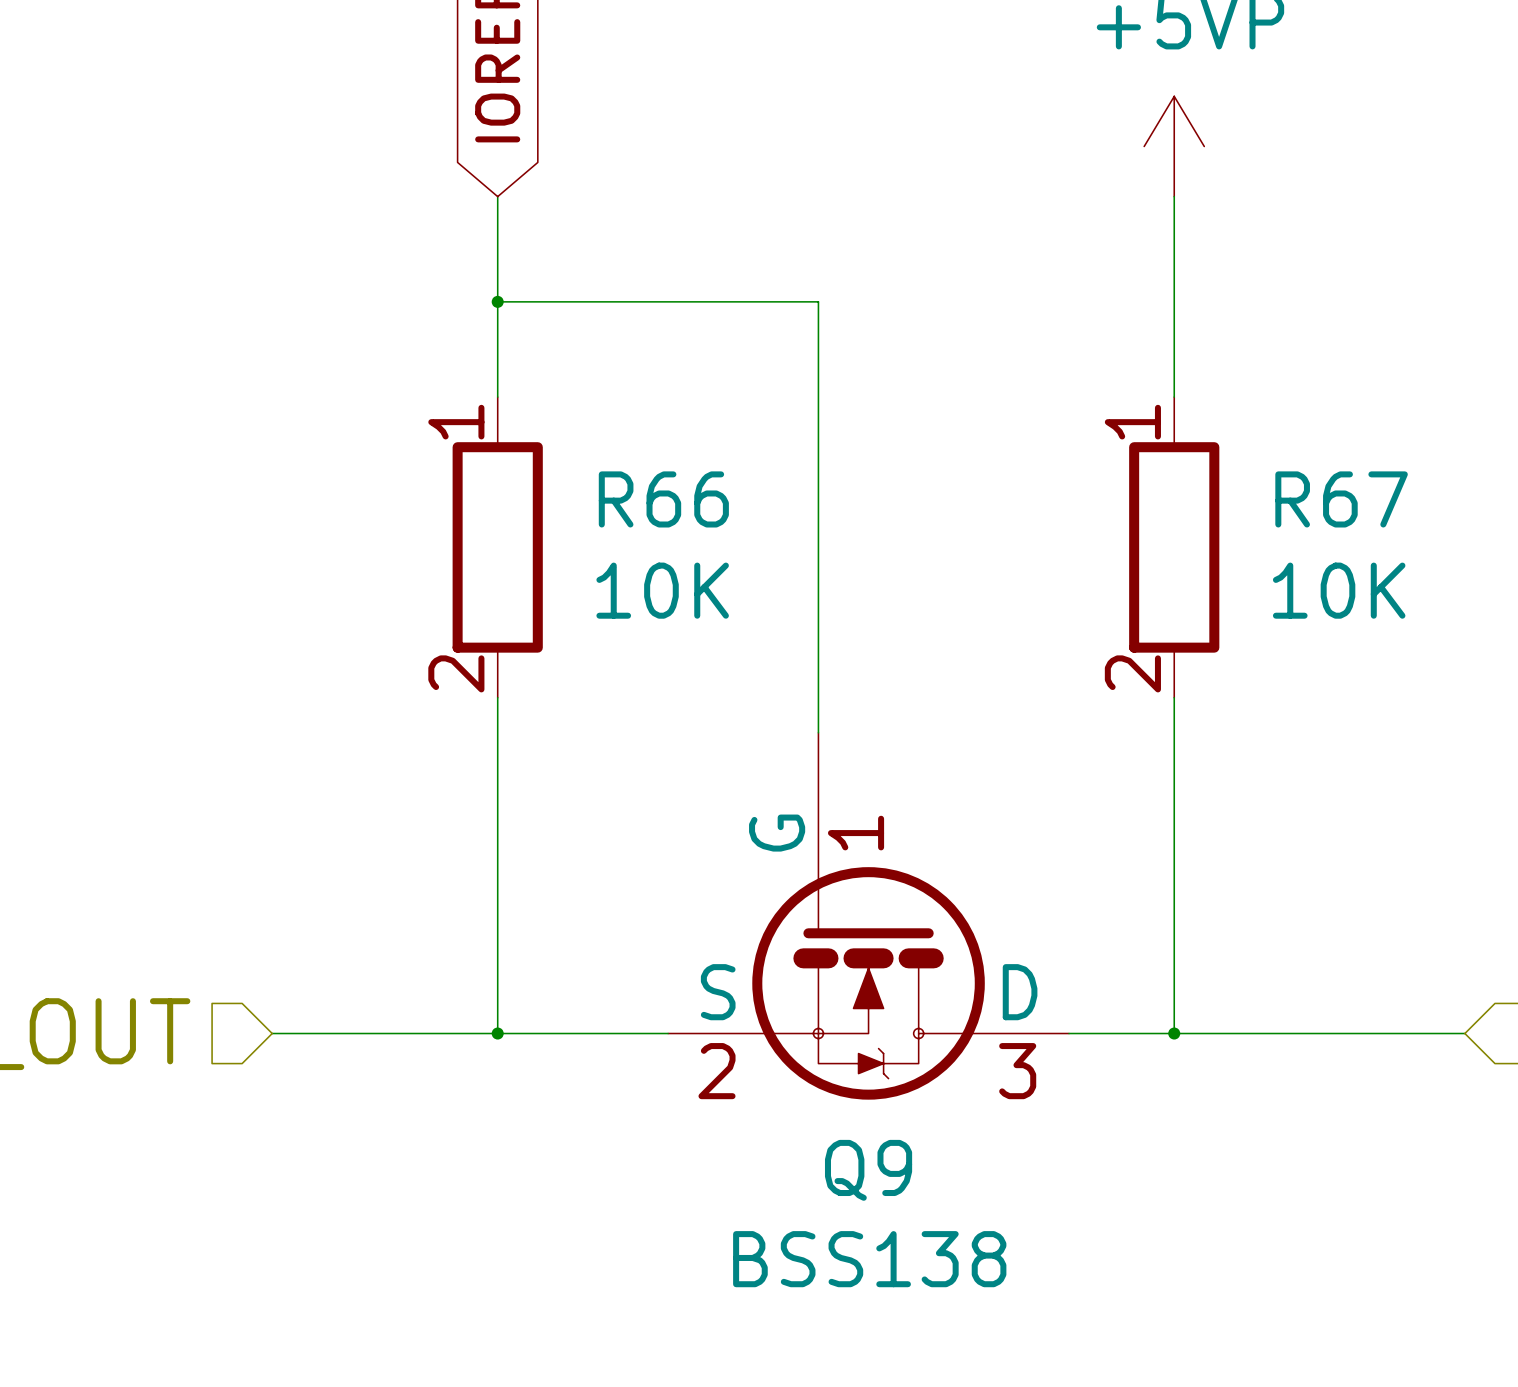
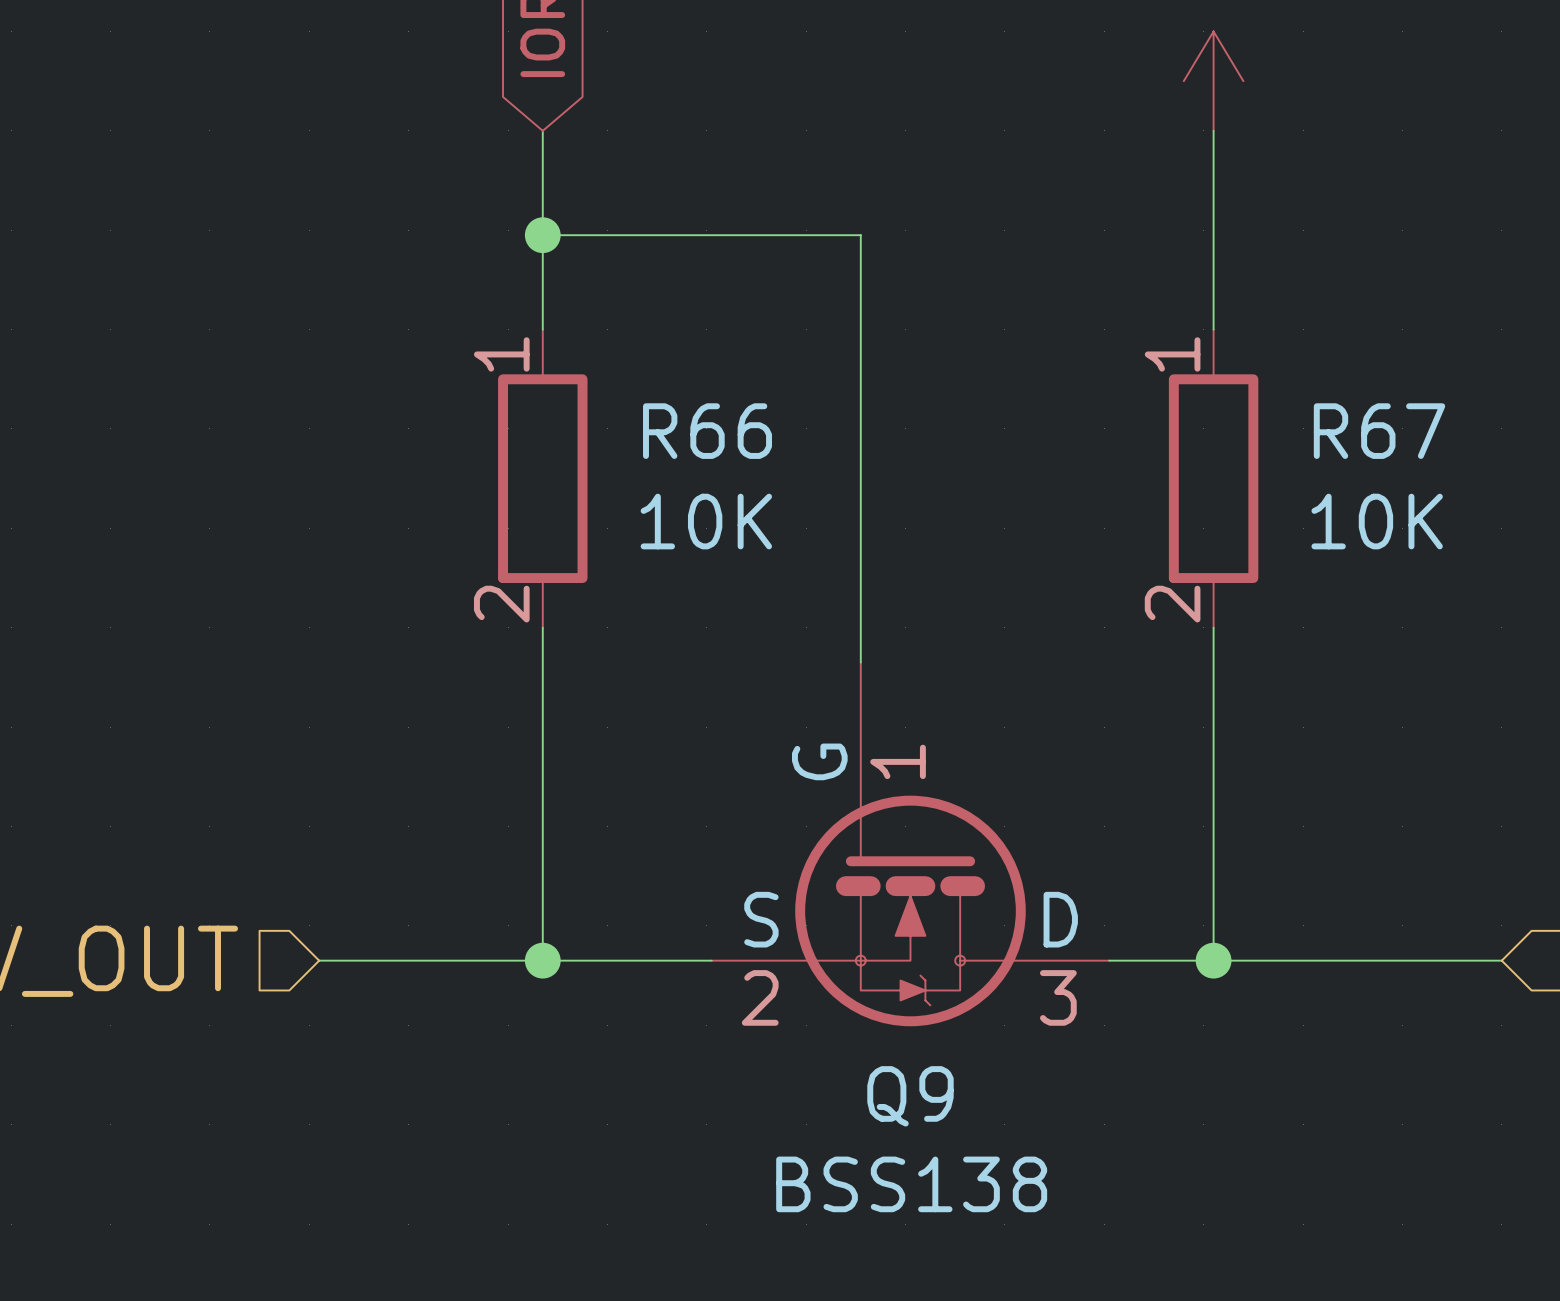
junction size: [491, 295, 504, 308] -> [524, 217, 561, 254]
junction size: [491, 1027, 504, 1040] -> [524, 942, 561, 979]
junction size: [1168, 1027, 1181, 1040] -> [1195, 942, 1232, 979]

